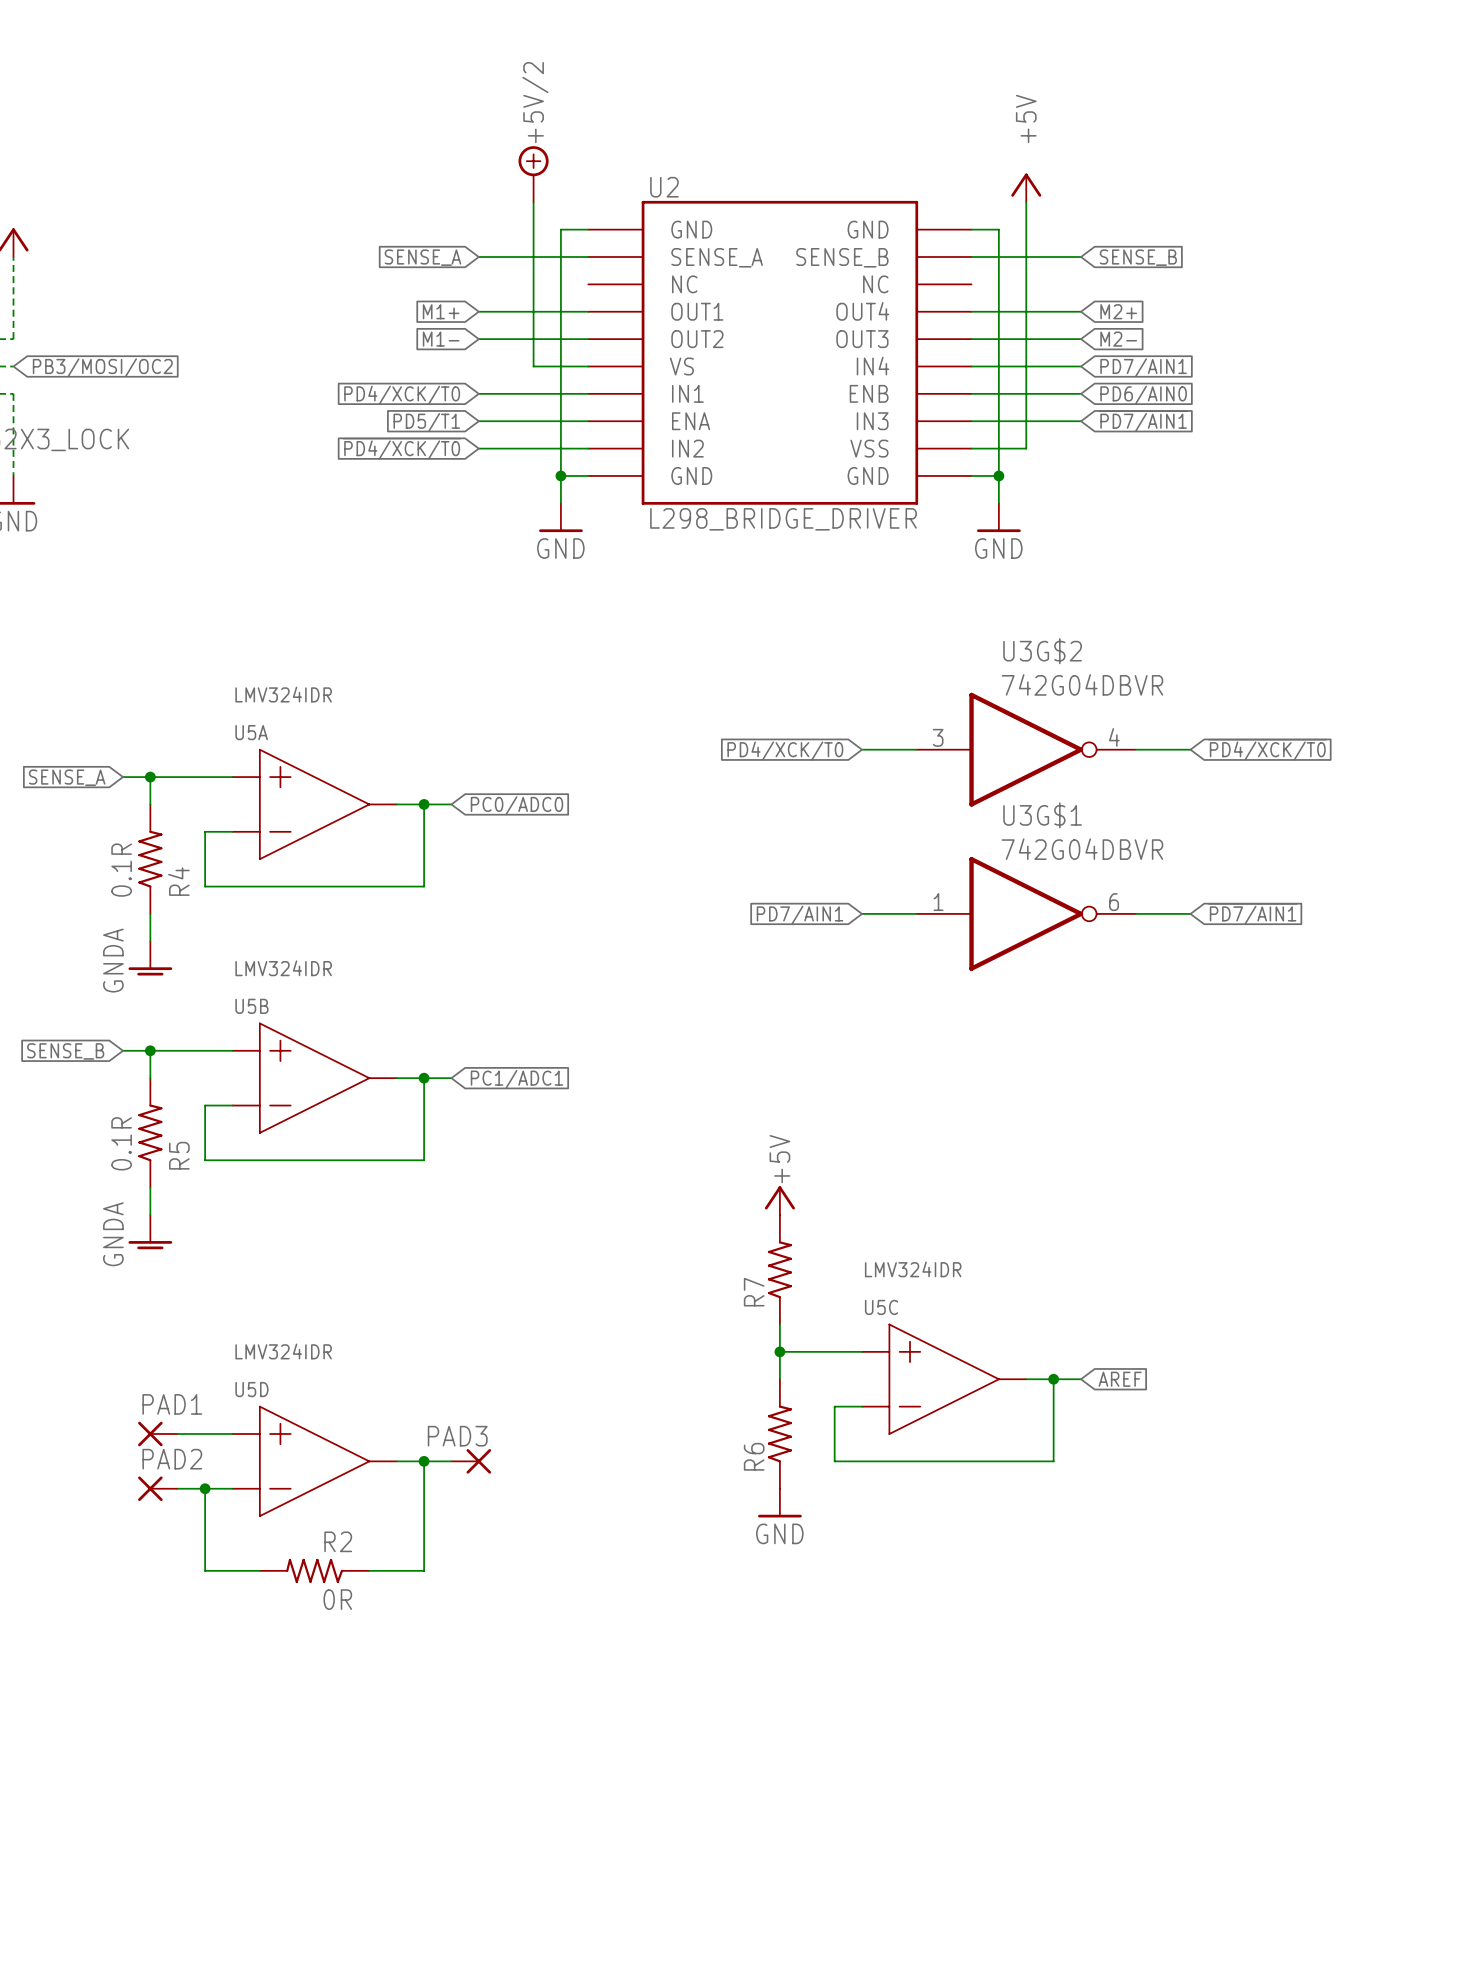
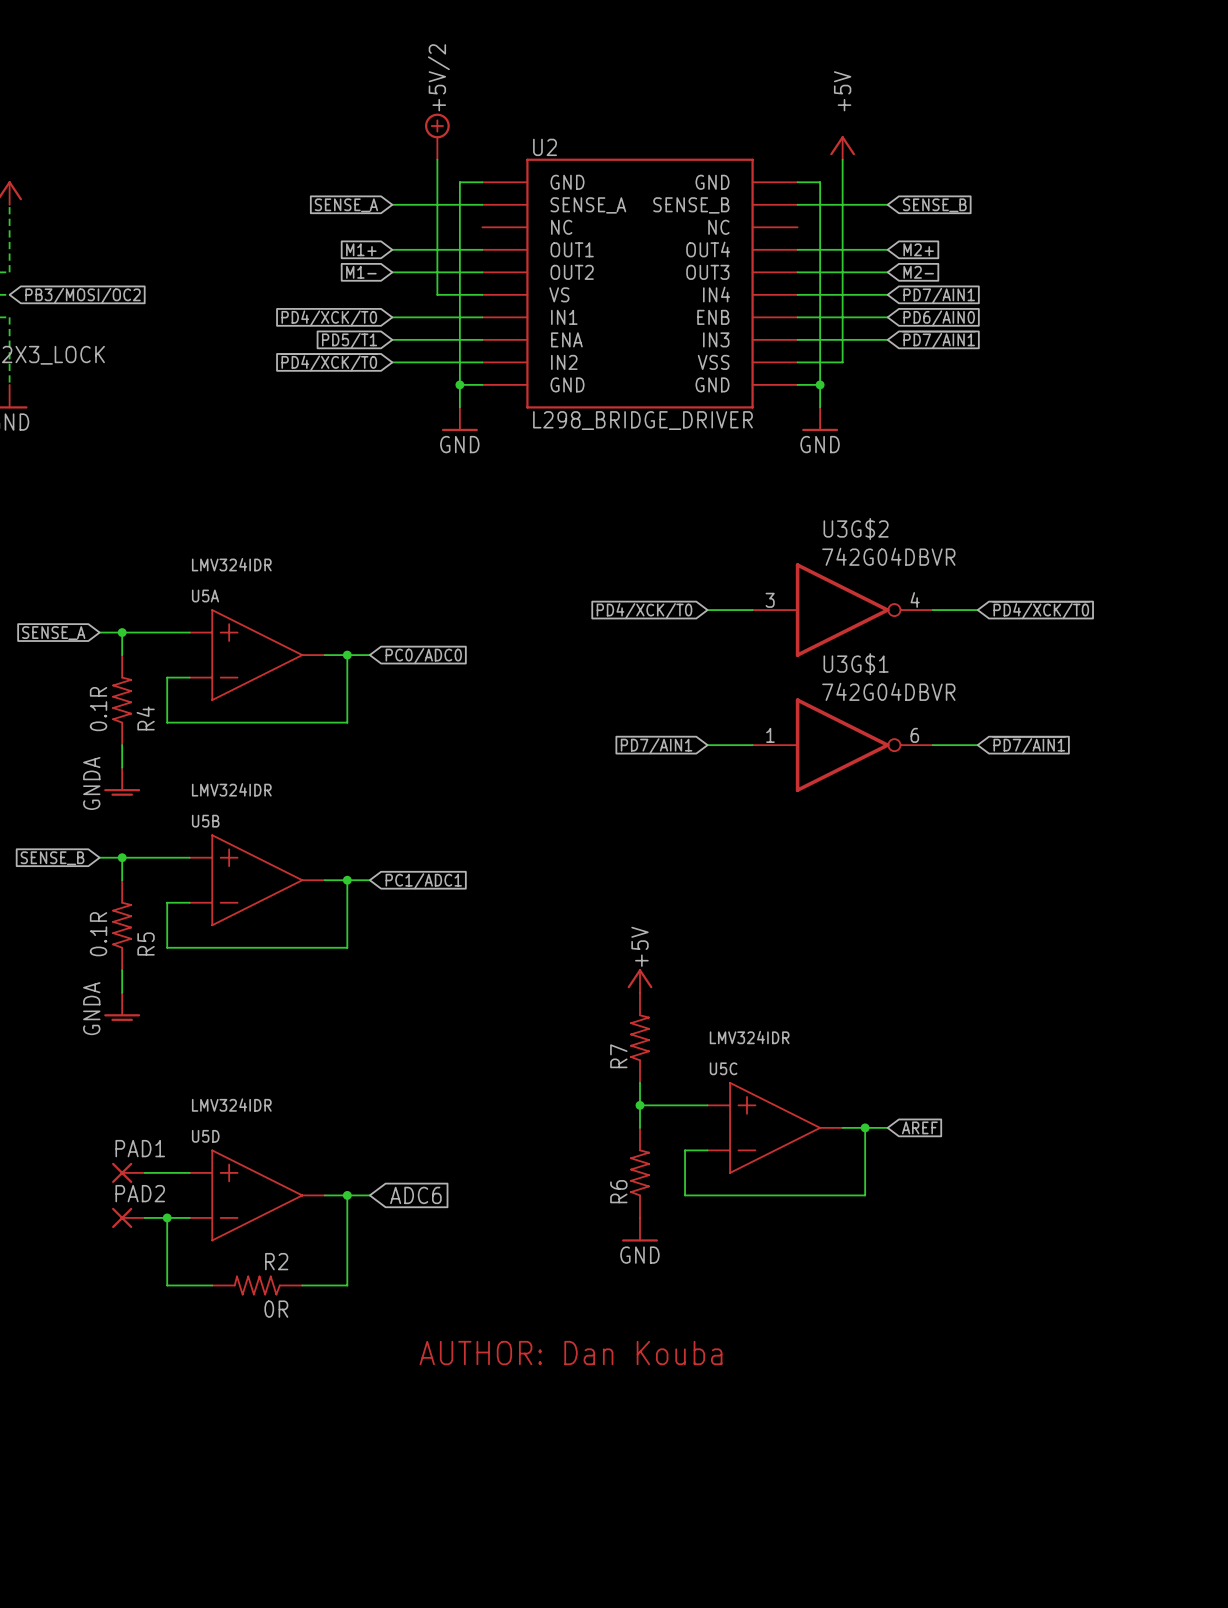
PAD3: (471, 1461) -> none
global label: none -> ADC6 (415, 1195)
text: none -> AUTHOR: Dan Kouba (571, 1353)

